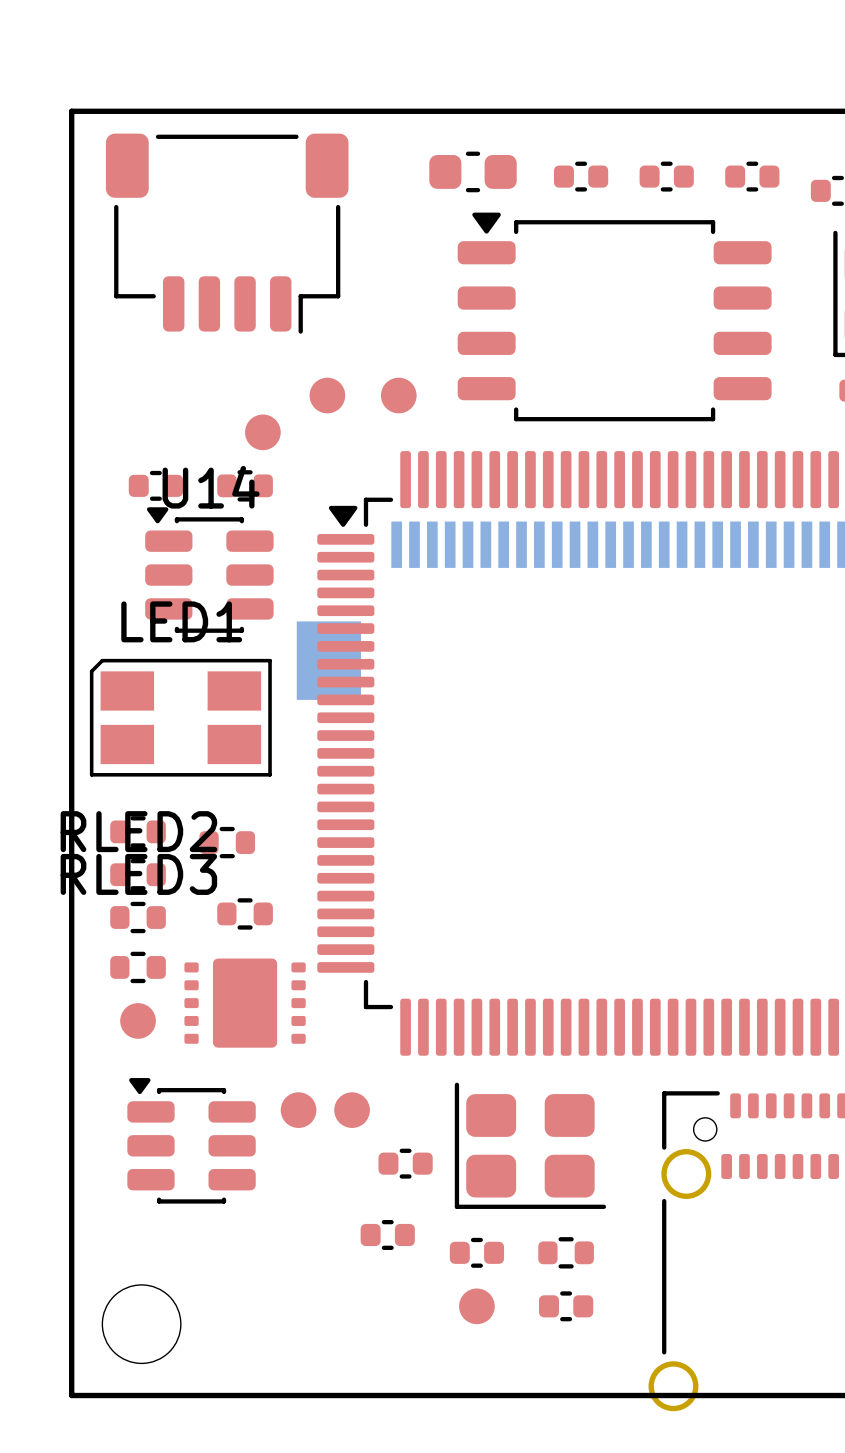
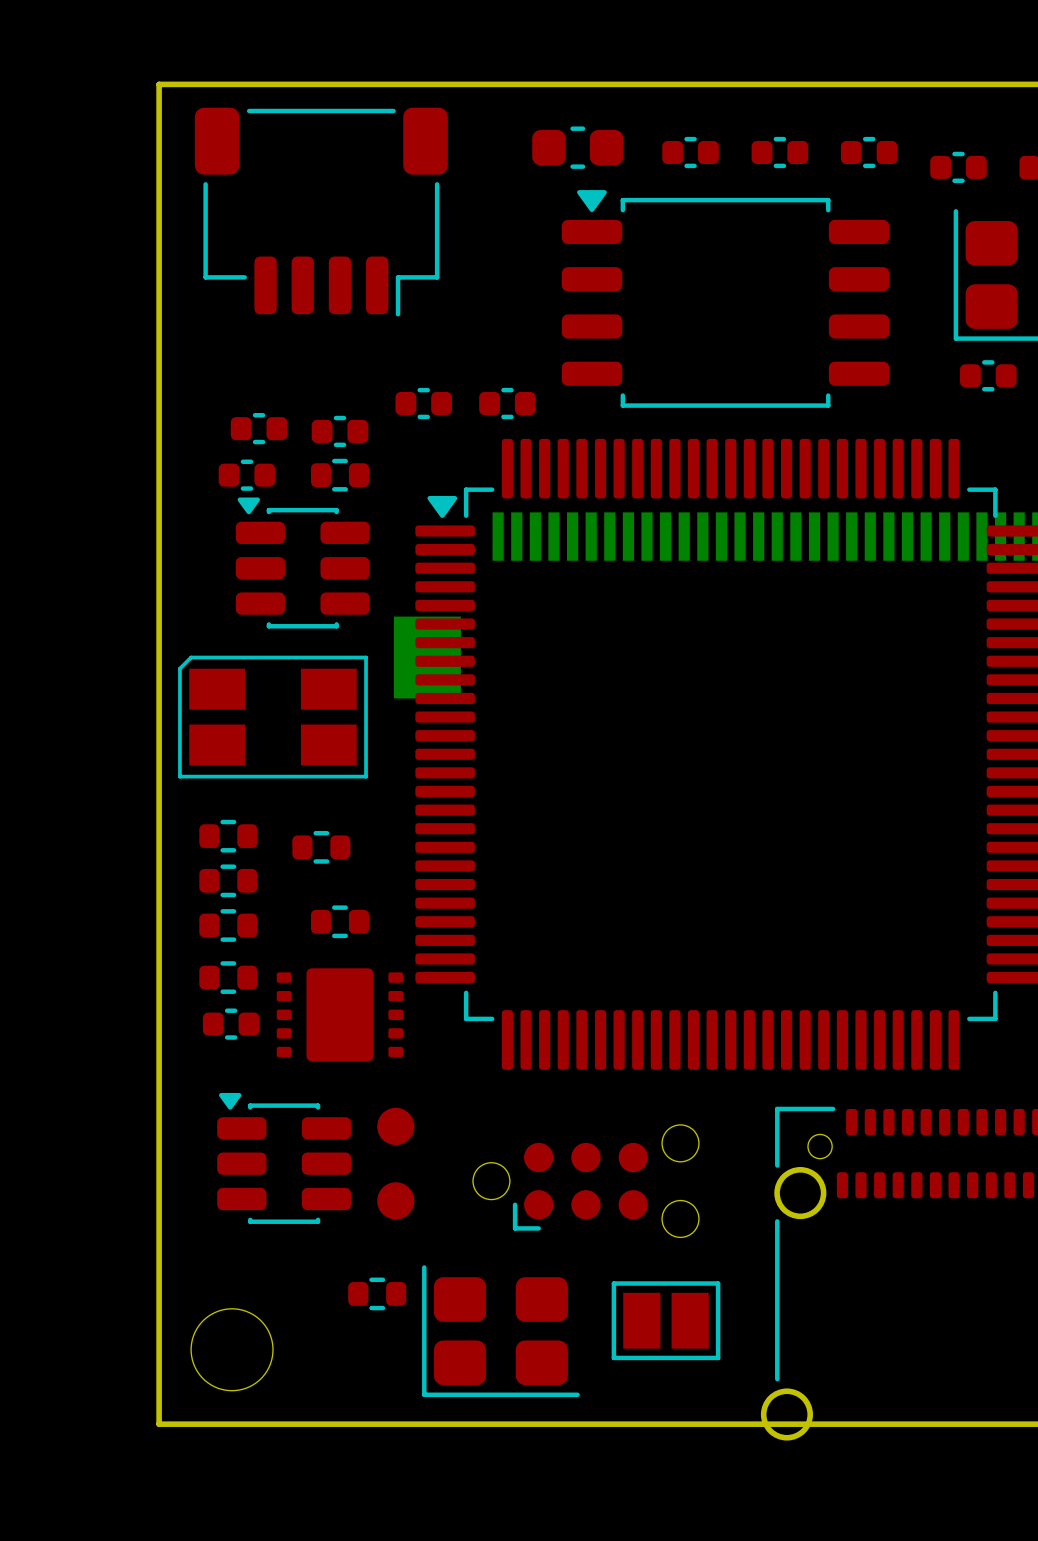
part footprint: [309, 377, 346, 414] -> [395, 387, 453, 420]
part footprint: [380, 377, 417, 414] -> [479, 387, 536, 420]
part footprint: [245, 414, 281, 451] -> [311, 415, 369, 448]
part: none -> (259, 428)
U14 name: U14 (211, 487) -> none
LED1 name: LED1 (181, 621) -> none
RLED2 name: RLED2 (138, 831) -> none
RLED3 name: RLED3 (138, 874) -> none
part footprint: [120, 1003, 156, 1039] -> [202, 1008, 260, 1040]
part position: (352, 1110) -> (395, 1200)
part position: (530, 1145) -> (500, 1331)
part: none -> (585, 1181)
part: (405, 1163) -> none
part: (387, 1234) -> none
part: (476, 1252) -> none
part: (566, 1252) -> none
part: none -> (377, 1293)
part footprint: [539, 1291, 594, 1322] -> [611, 1281, 721, 1361]
part: (476, 1306) -> none

